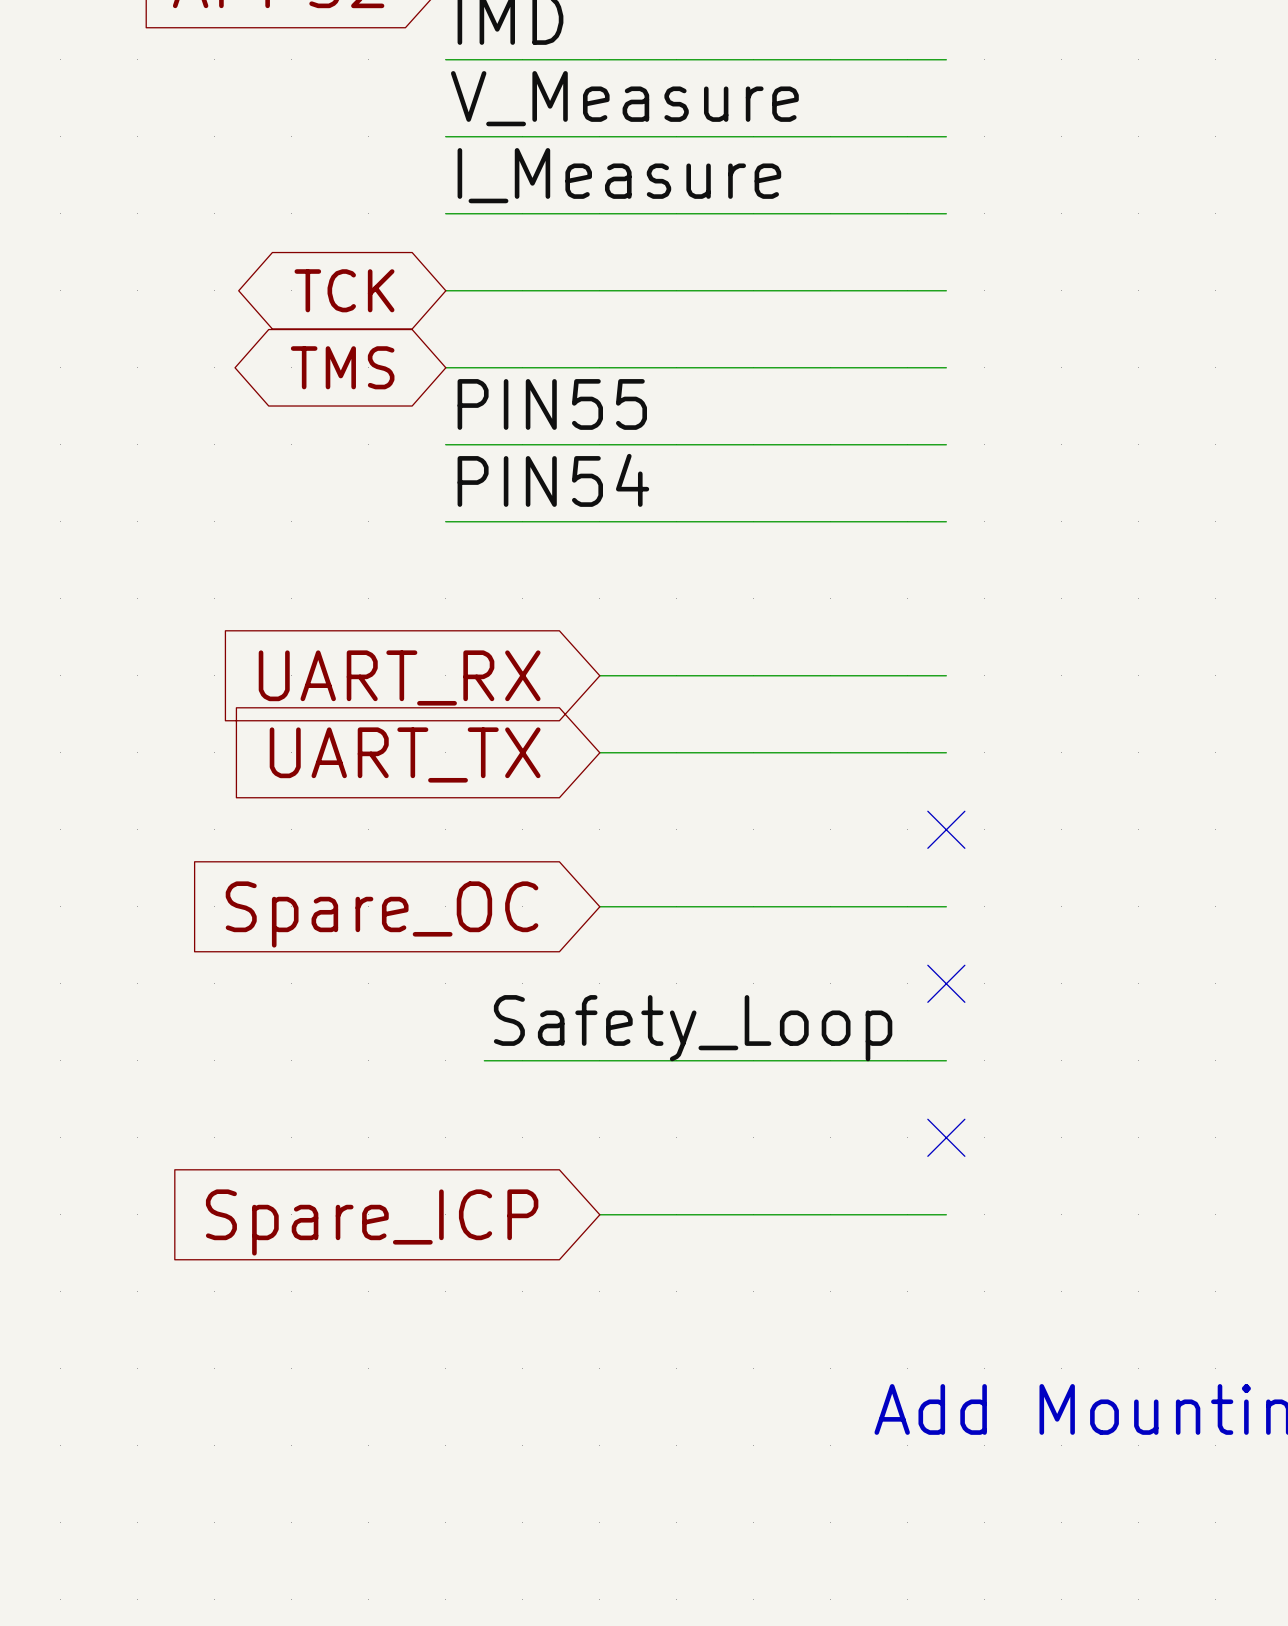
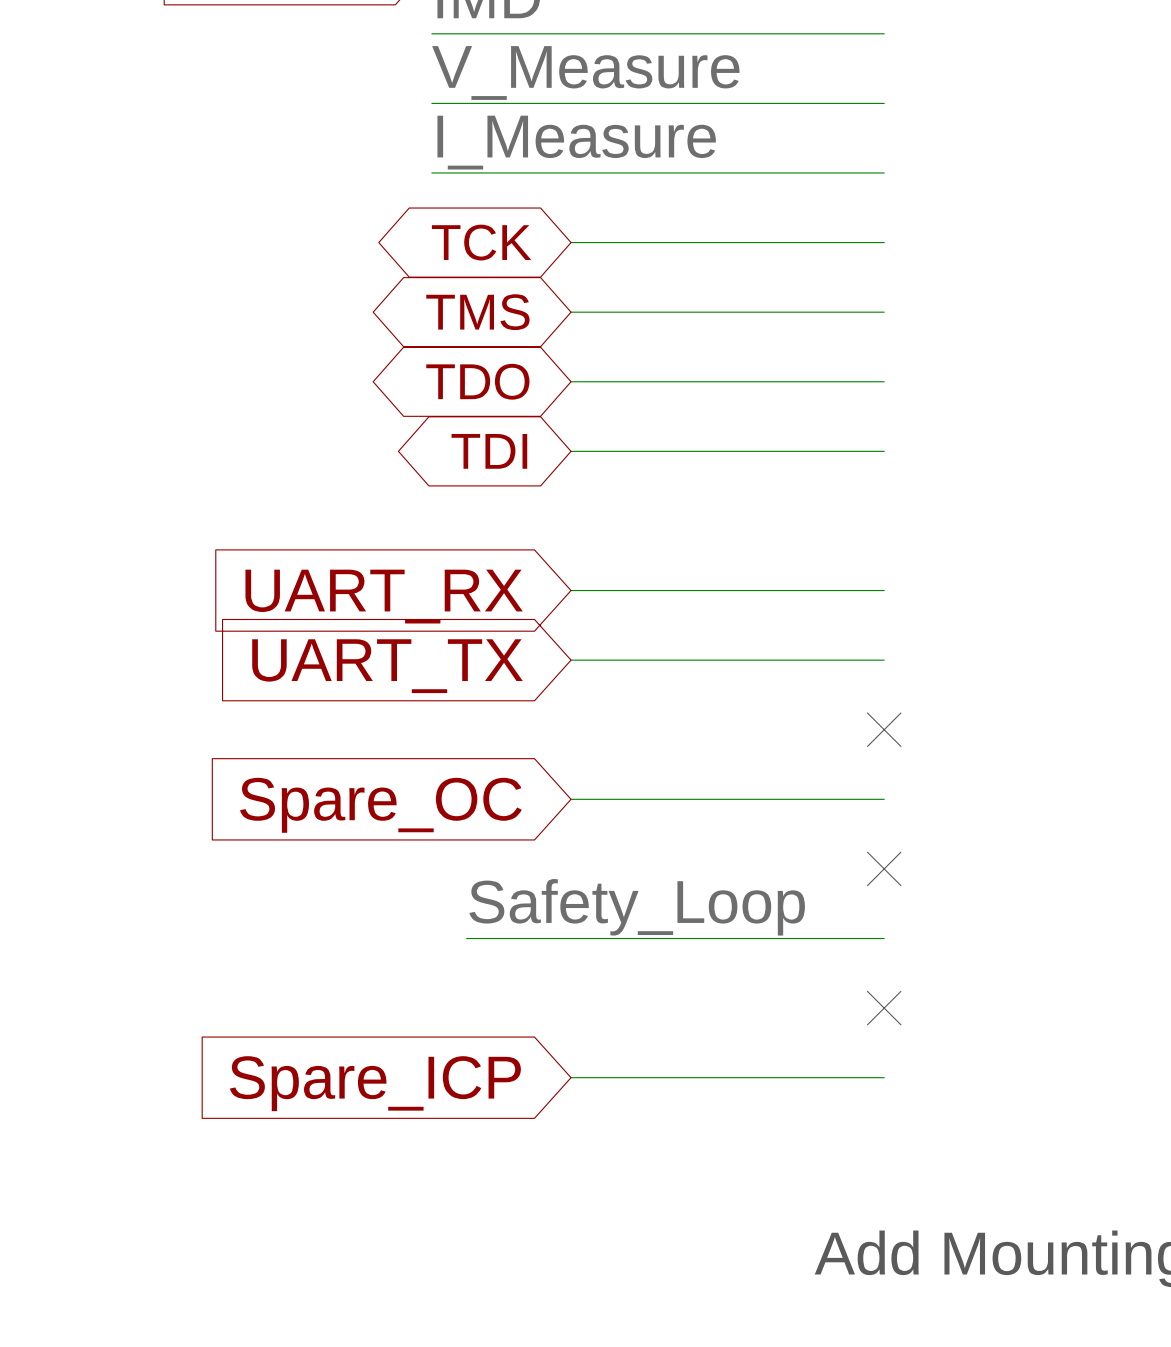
global label position: TCK (344, 290) -> TCK (481, 242)
wire: (445, 290) (599, 290) -> none
global label position: TMS (342, 367) -> TMS (477, 312)
wire: (445, 367) (599, 367) -> none
label: PIN55 (552, 404) -> none
wire: (445, 444) (599, 444) -> none
global label: none -> TDO (477, 381)
label: PIN54 (553, 480) -> none
wire: (445, 521) (599, 521) -> none
global label: none -> TDI (489, 451)

